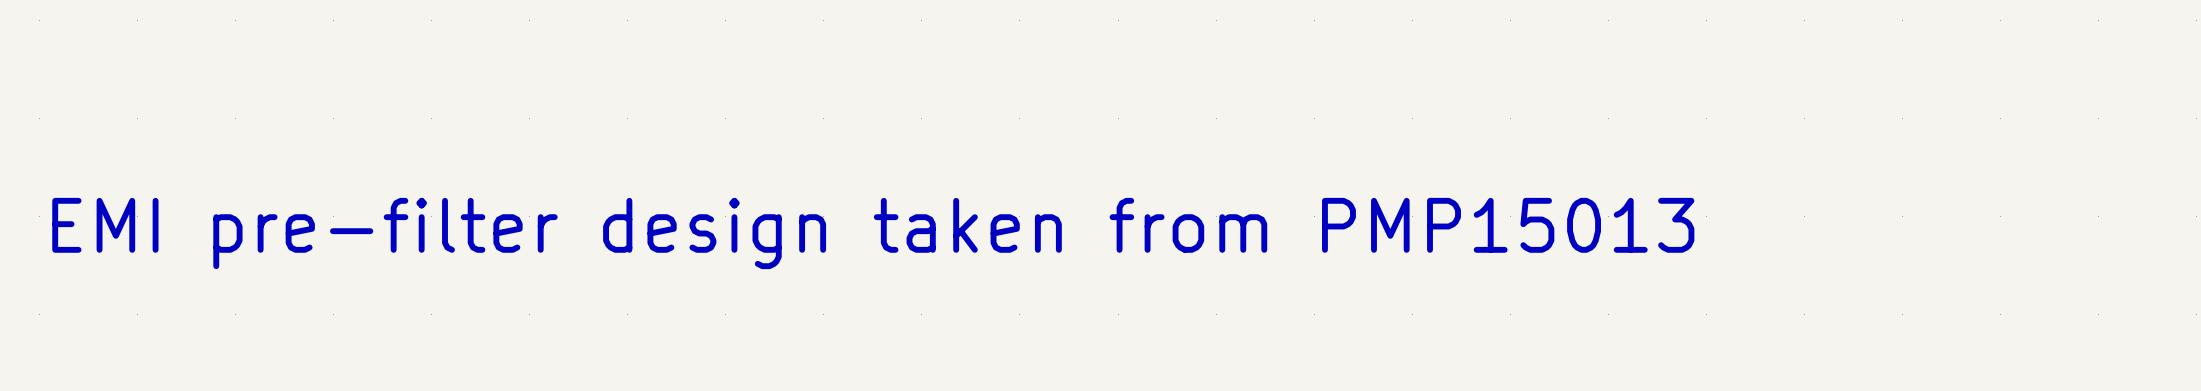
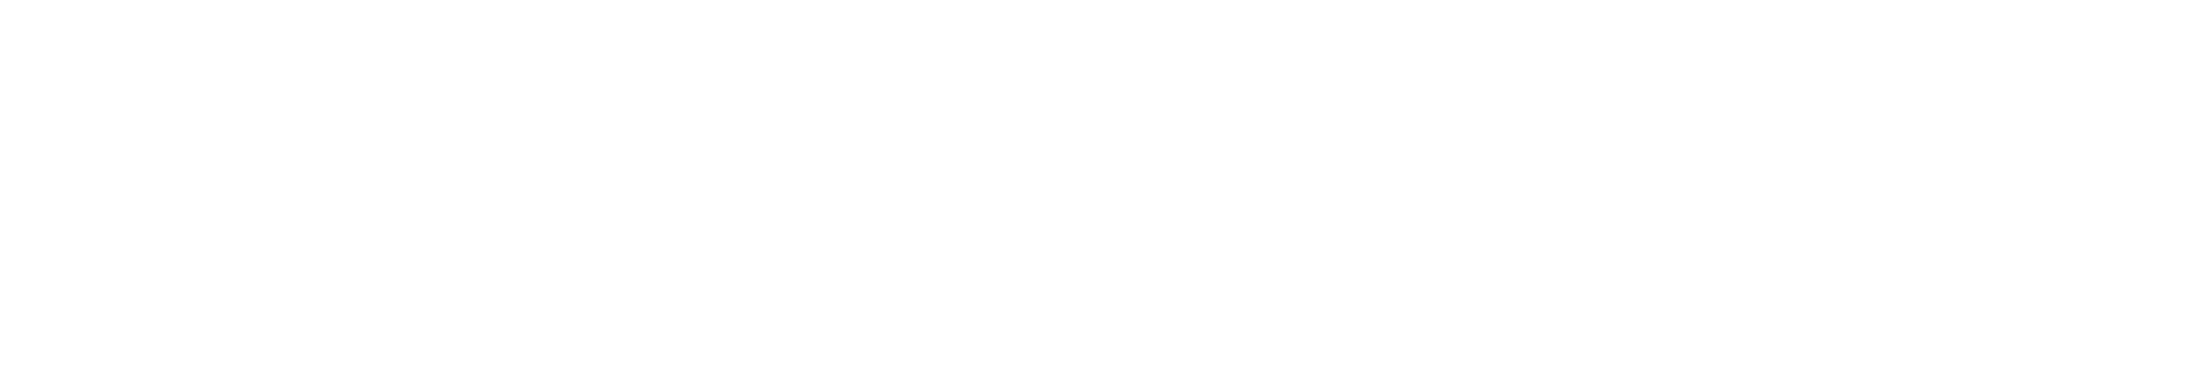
text: EMI pre-filter design taken from PMP15013 (873, 233) -> none

